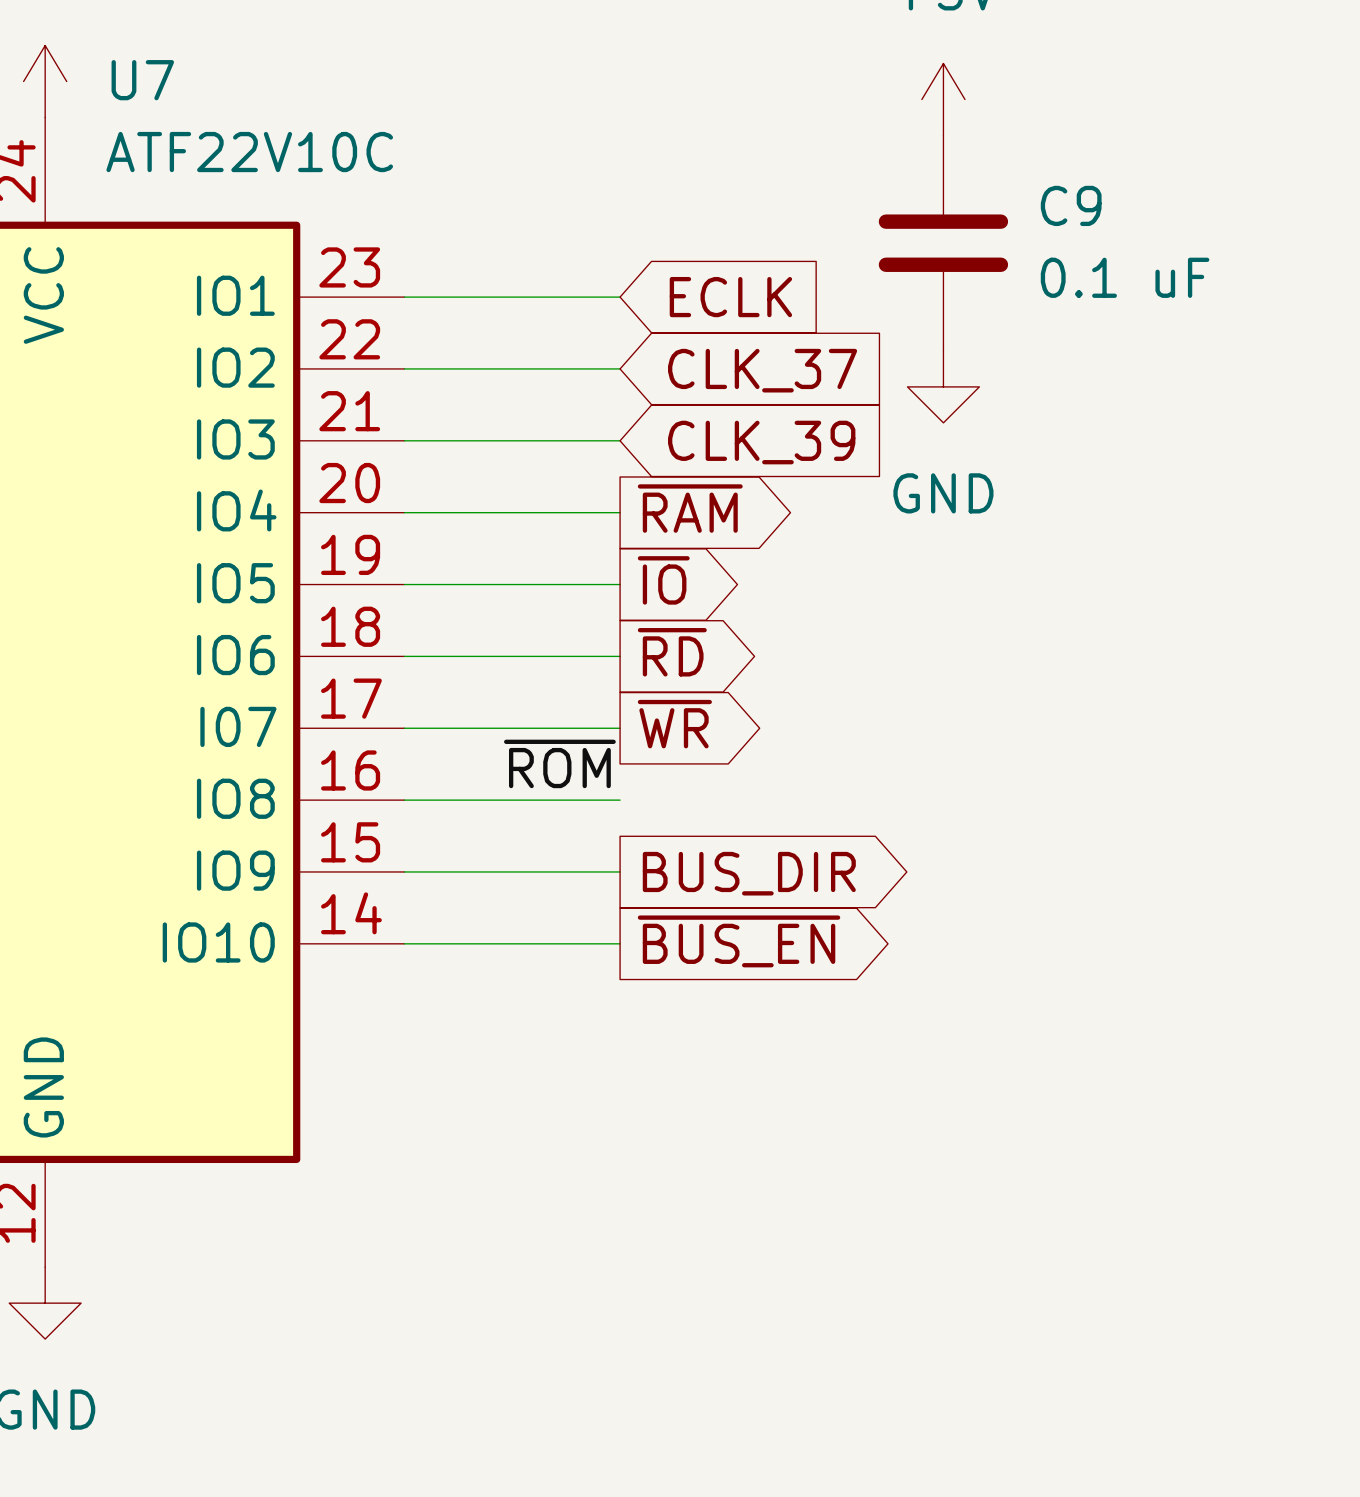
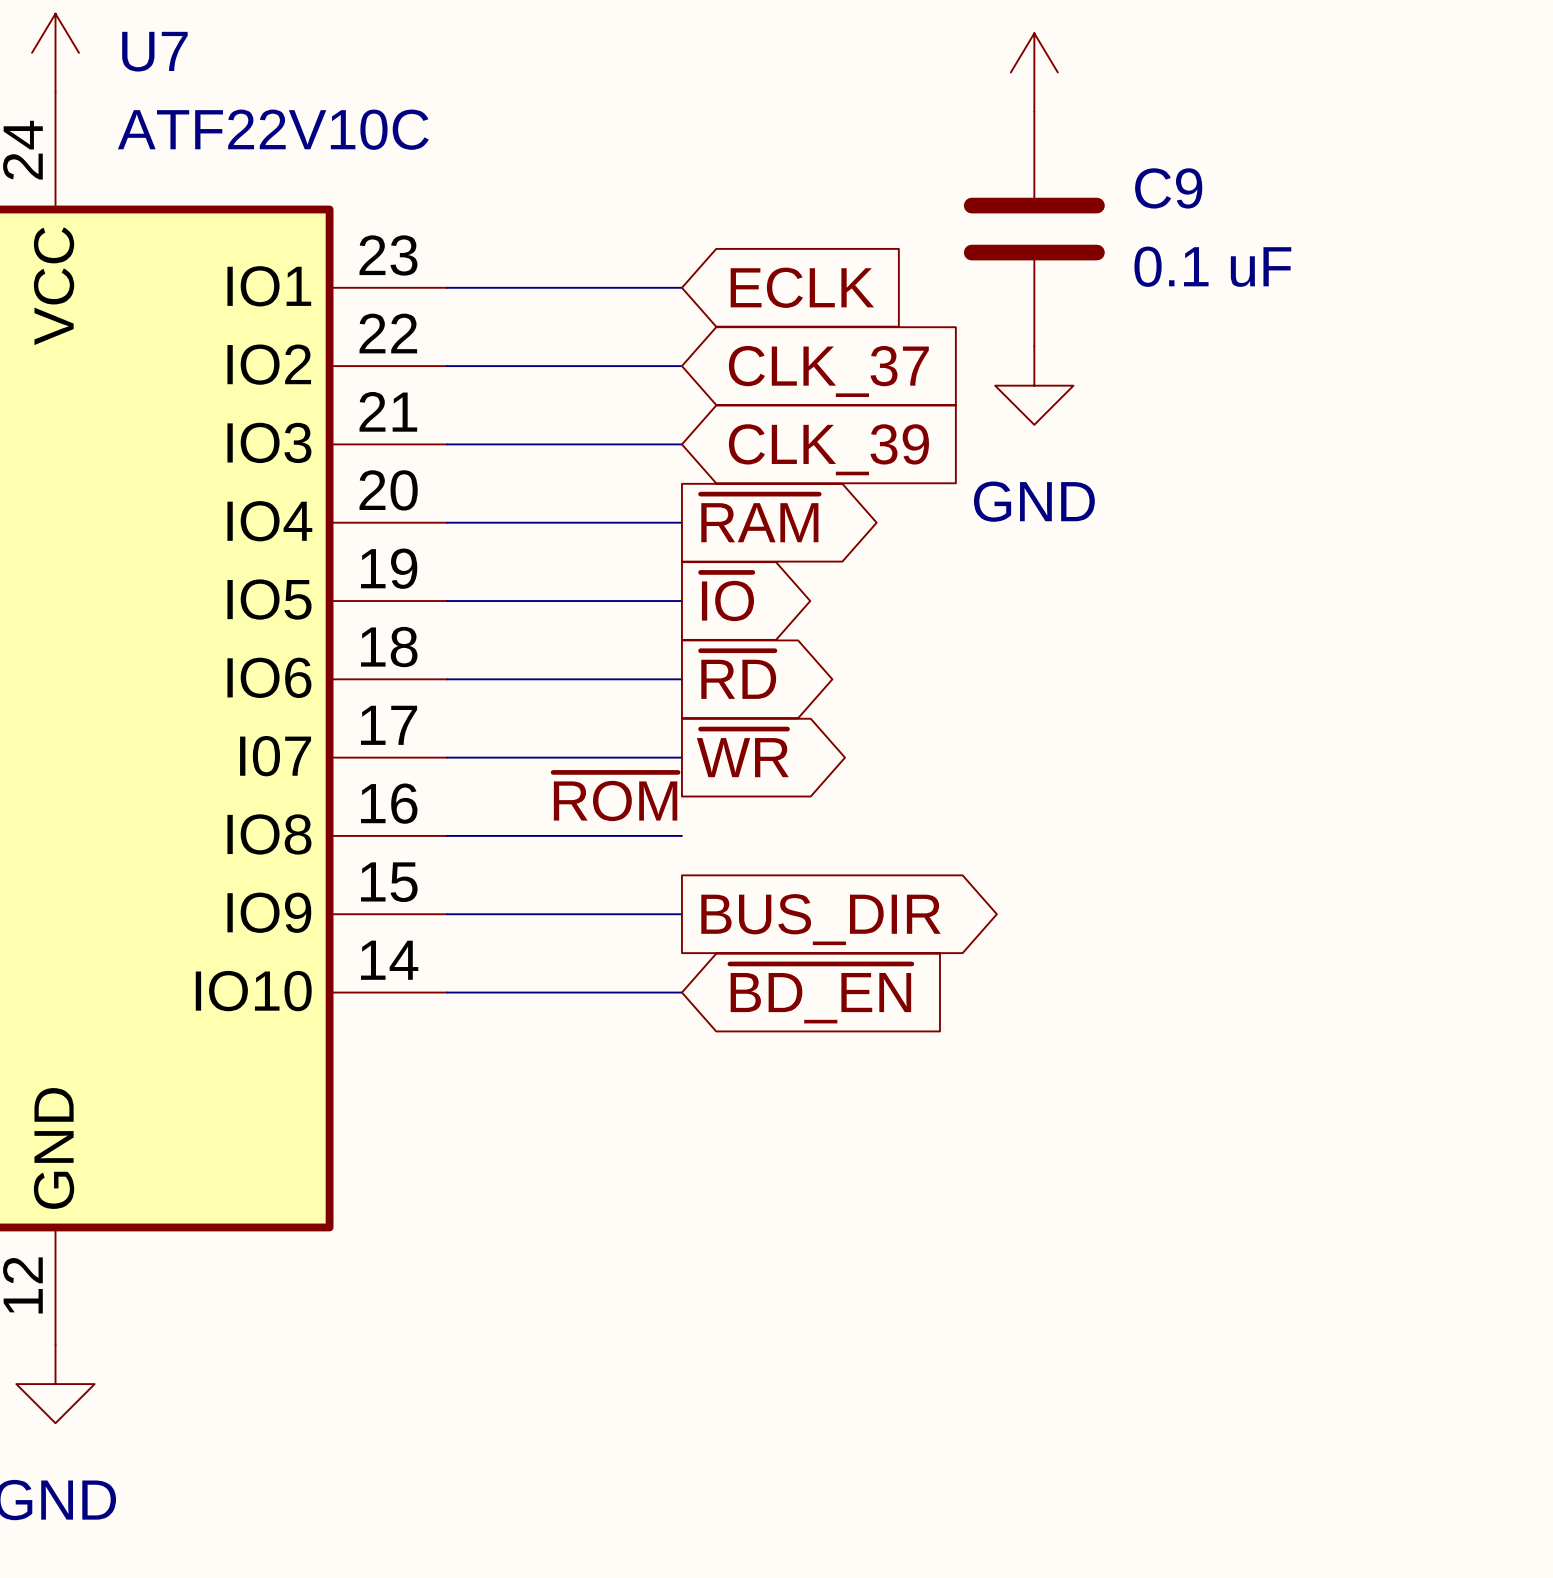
global label shape: output (739, 941) -> input (820, 993)
global label: ~{BUS_EN} (739, 941) -> ~{BD_EN} (820, 993)

